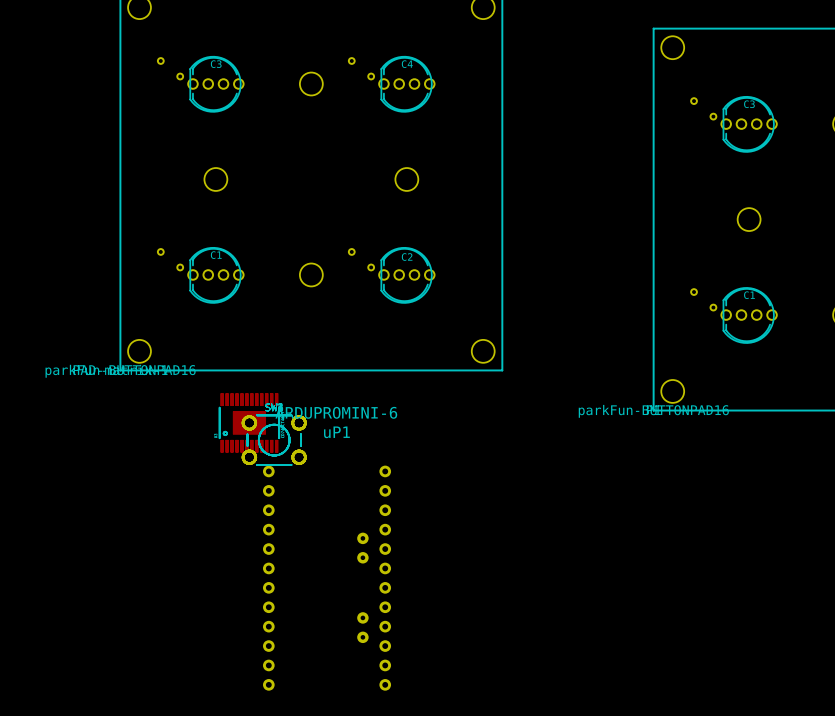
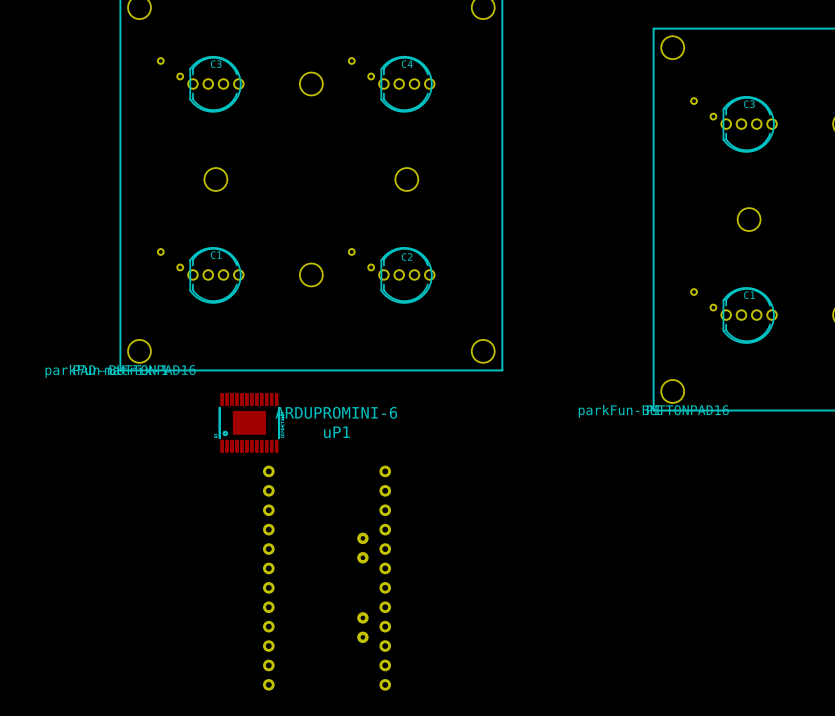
part: (274, 440) -> none
part: (274, 440) -> none
part: (274, 440) -> none
part: (274, 440) -> none

